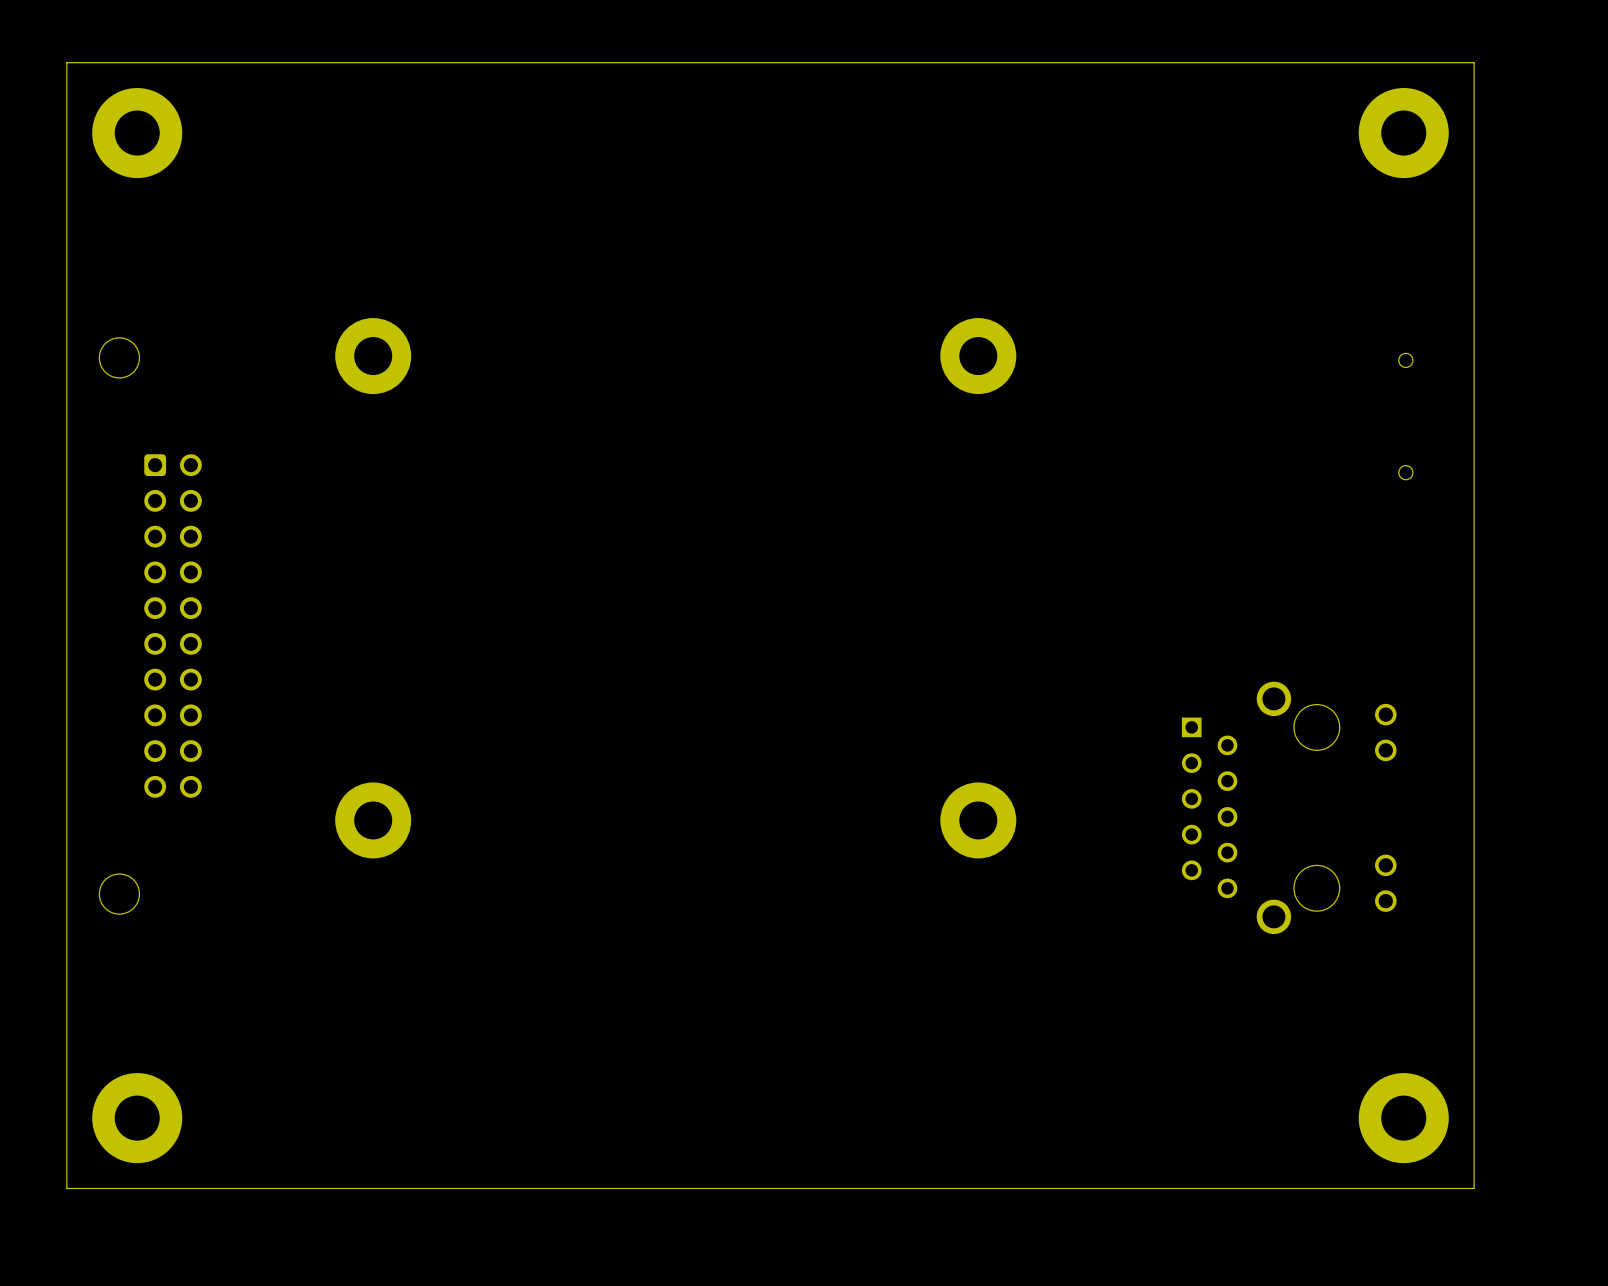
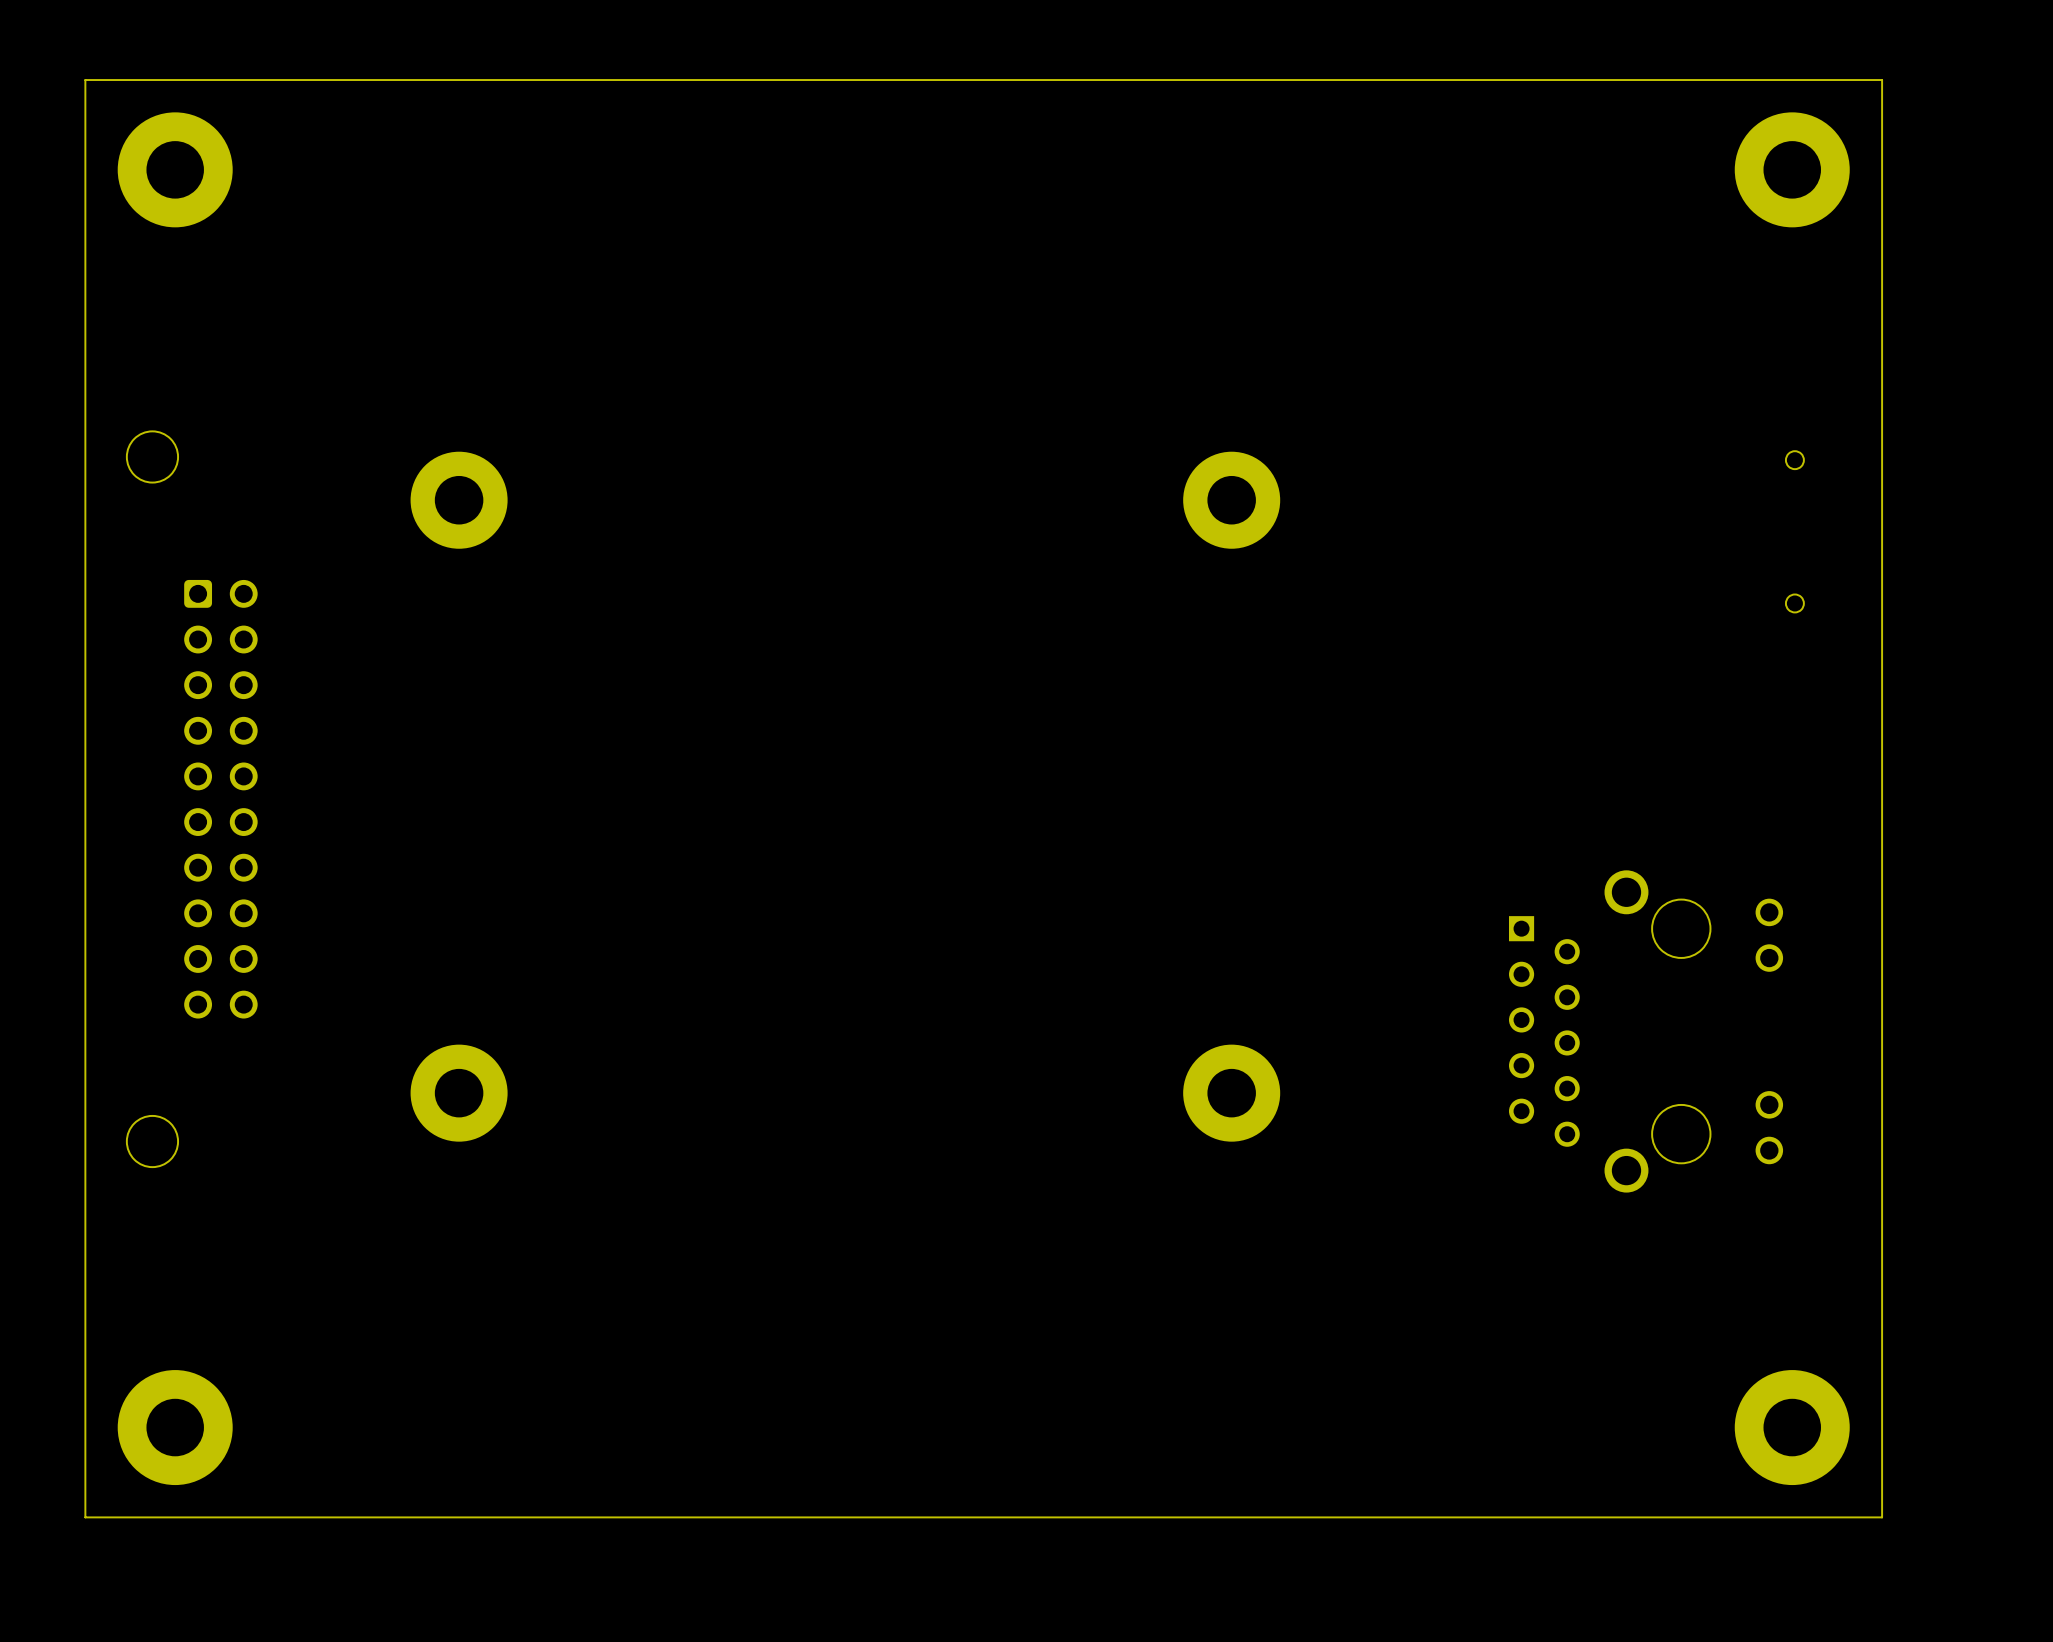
part position: (373, 356) -> (459, 500)
part position: (978, 356) -> (1231, 500)
part position: (373, 820) -> (459, 1093)
part position: (978, 820) -> (1231, 1093)

